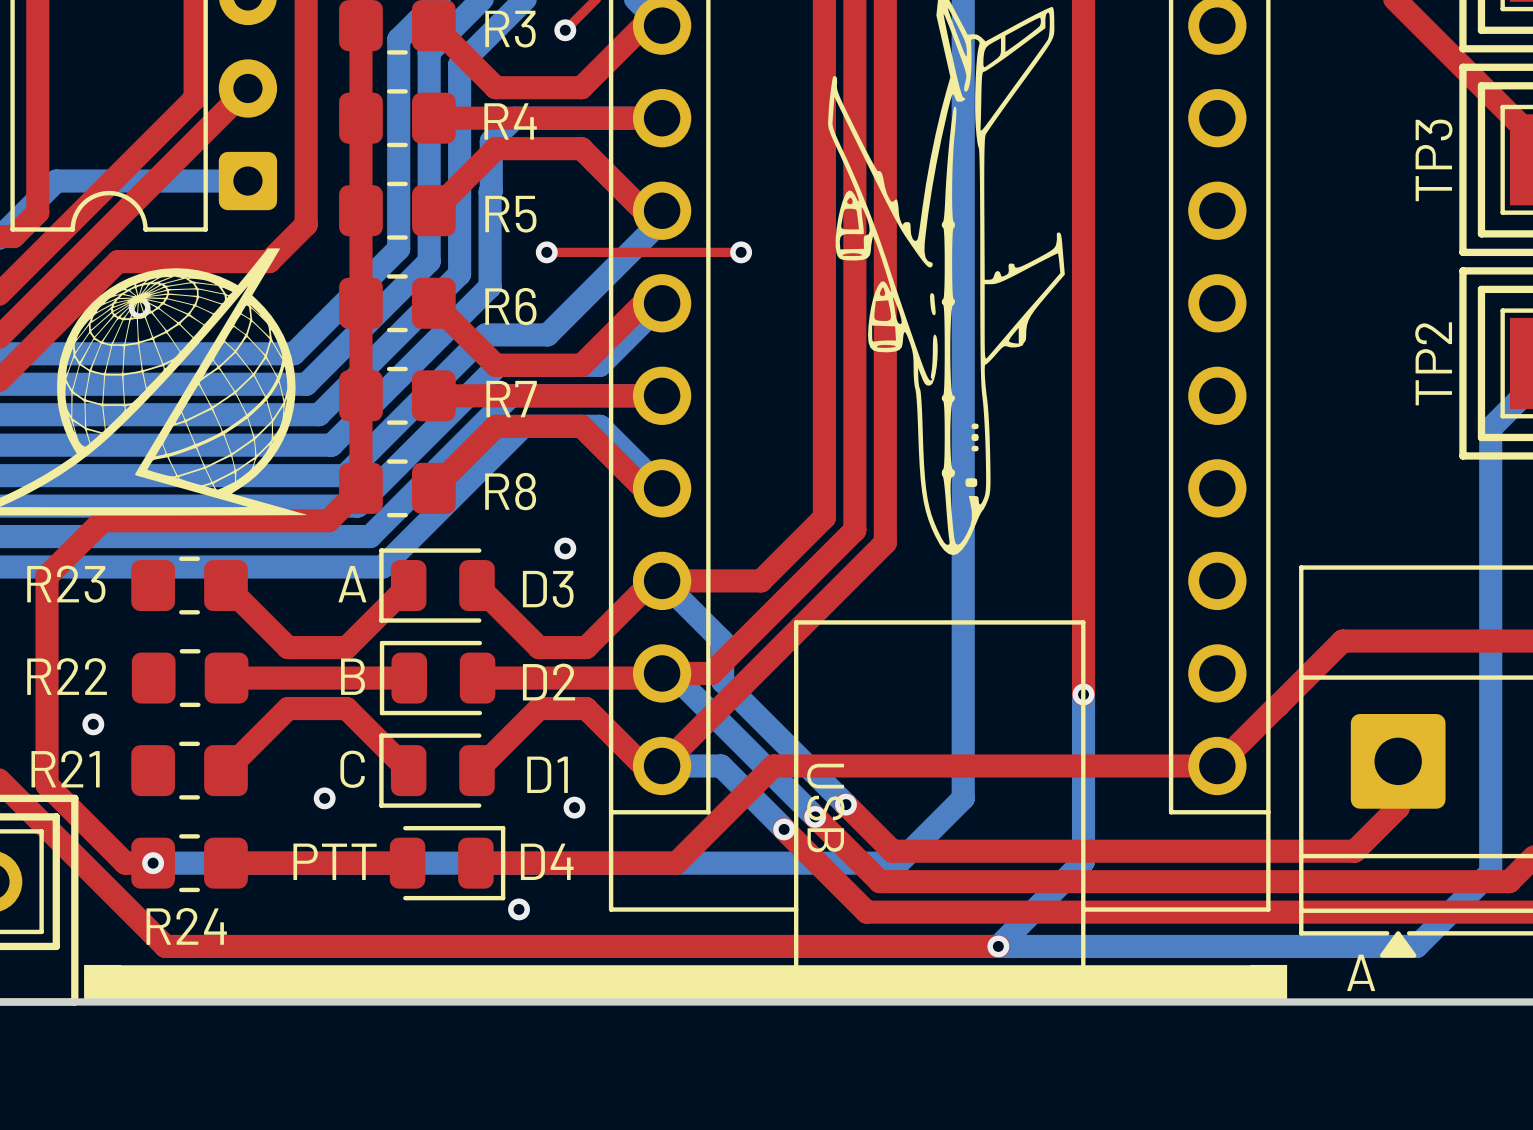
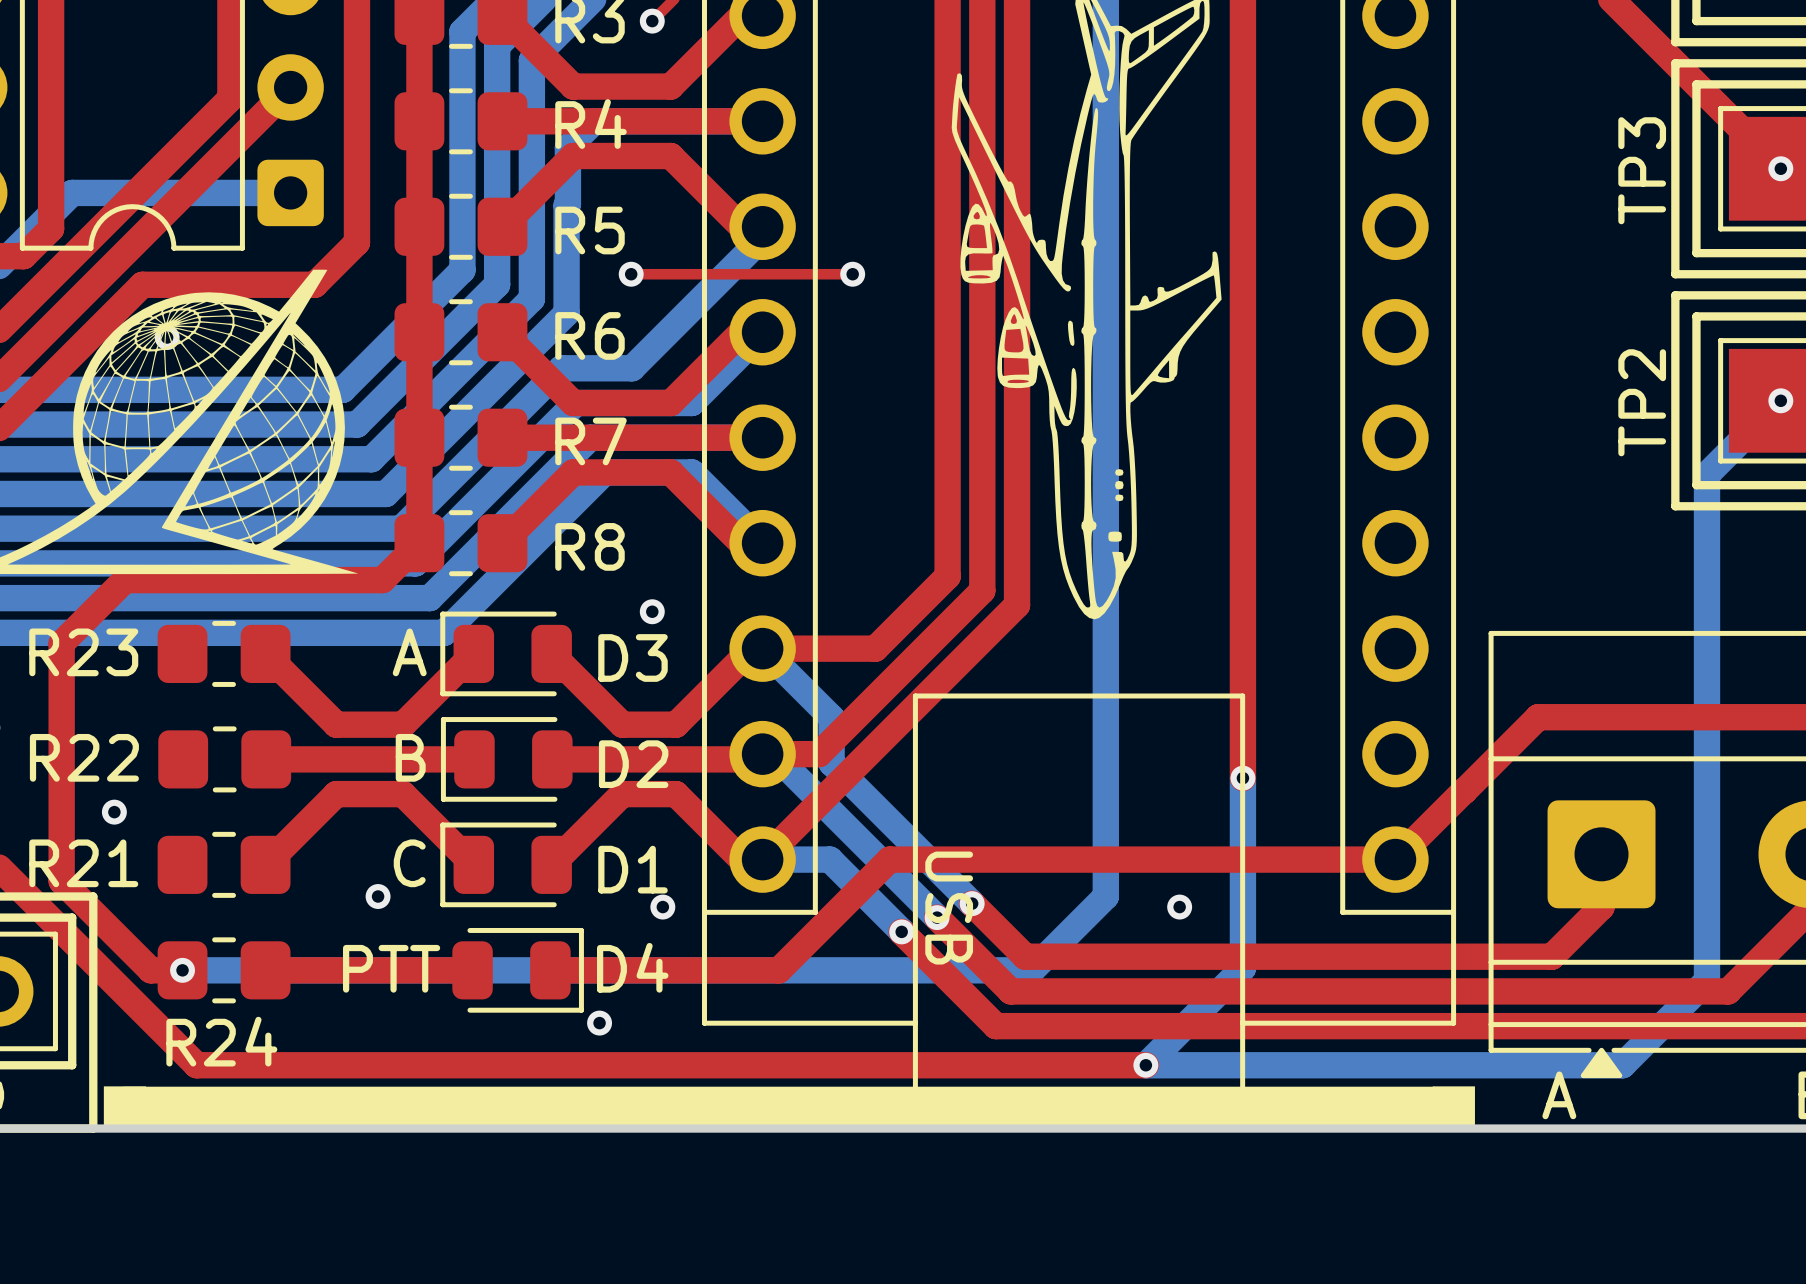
via: none -> (1179, 907)

